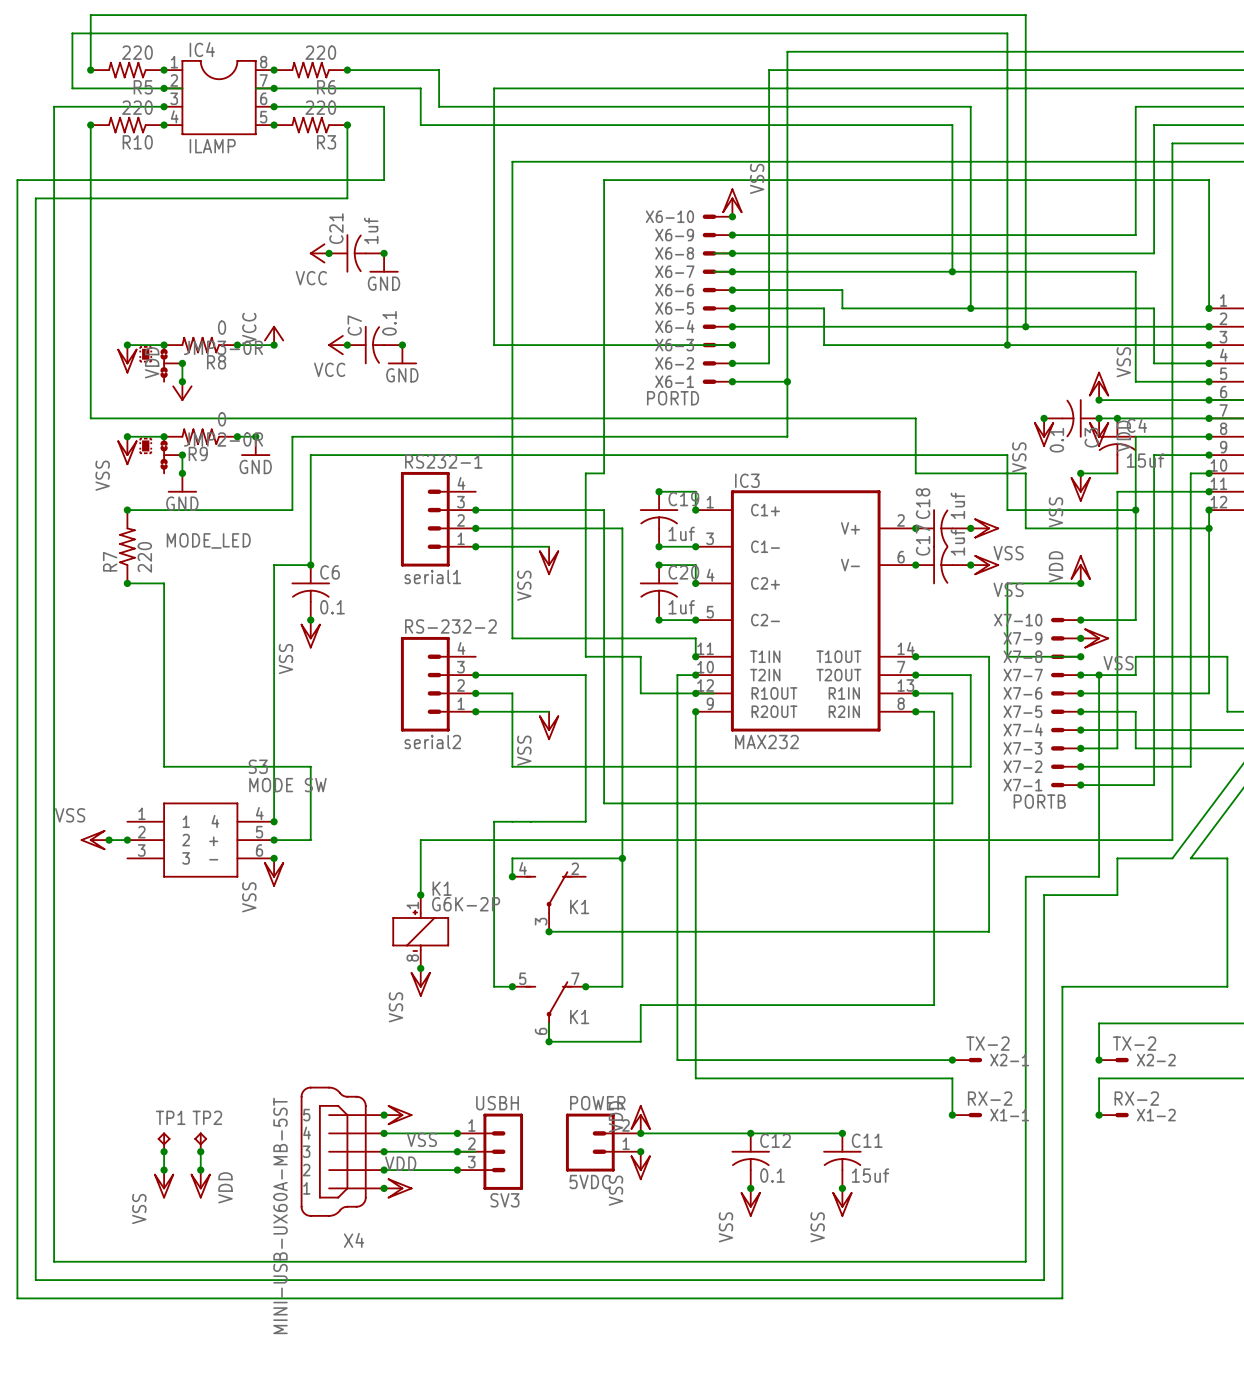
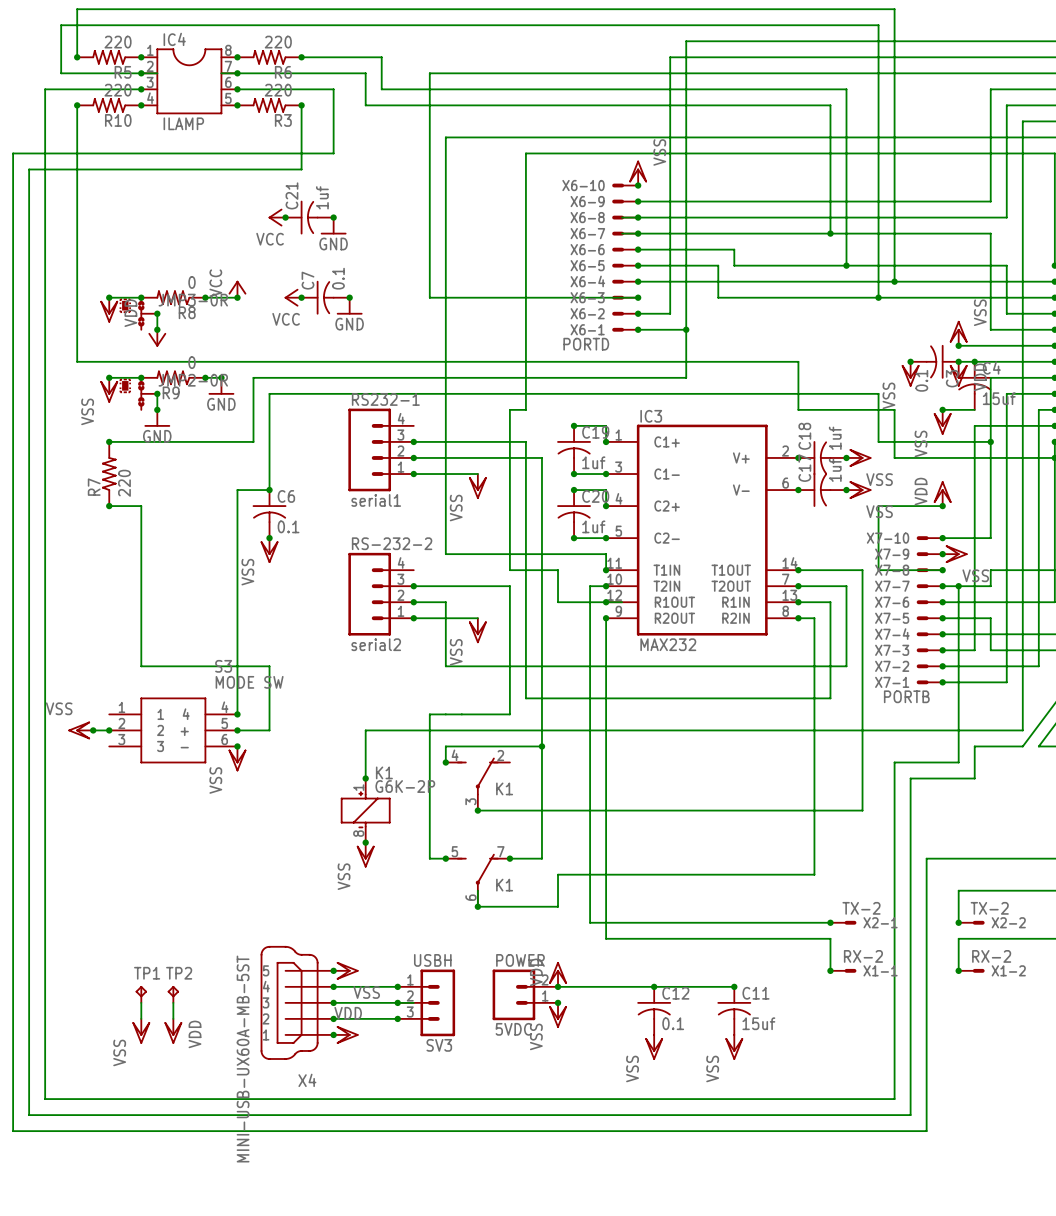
label: MODE_LED (208, 540) -> none
junction: (164, 1151) -> none
junction: (200, 1151) -> none
junction: (164, 1170) -> none
junction: (200, 1170) -> none
junction: (750, 1188) -> none
junction: (842, 1188) -> none

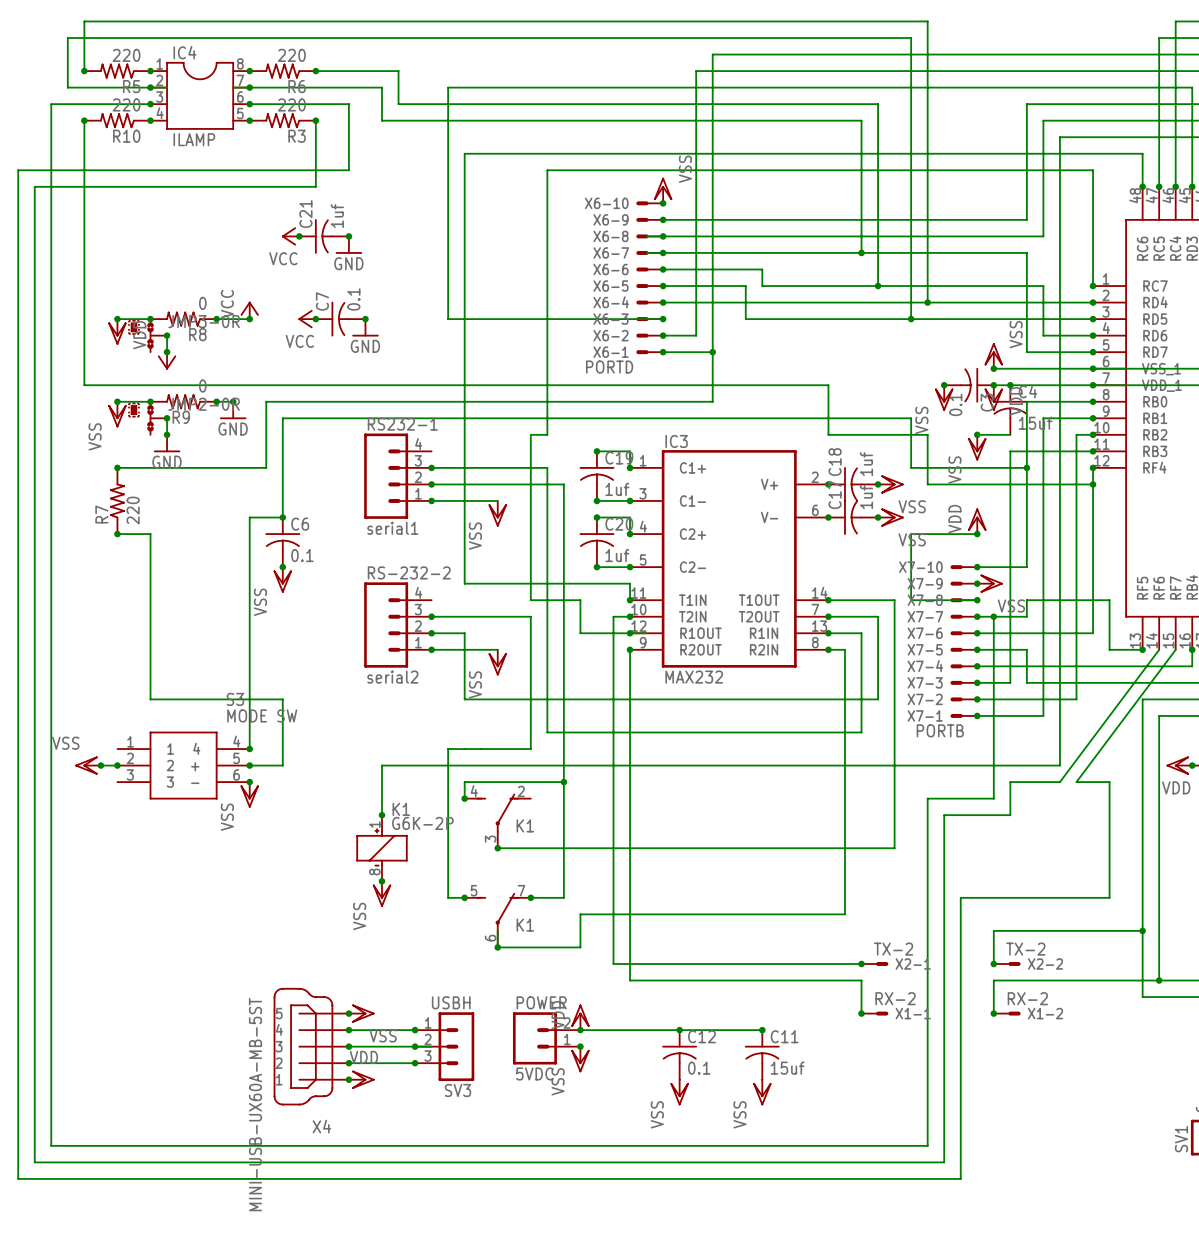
TP1: (141, 994) -> none
TP2: (173, 994) -> none
wire: (141, 1002) (141, 1018) -> none
wire: (173, 1002) (173, 1018) -> none
power symbol: VSS (141, 1031) -> none
power symbol: VDD (173, 1031) -> none

